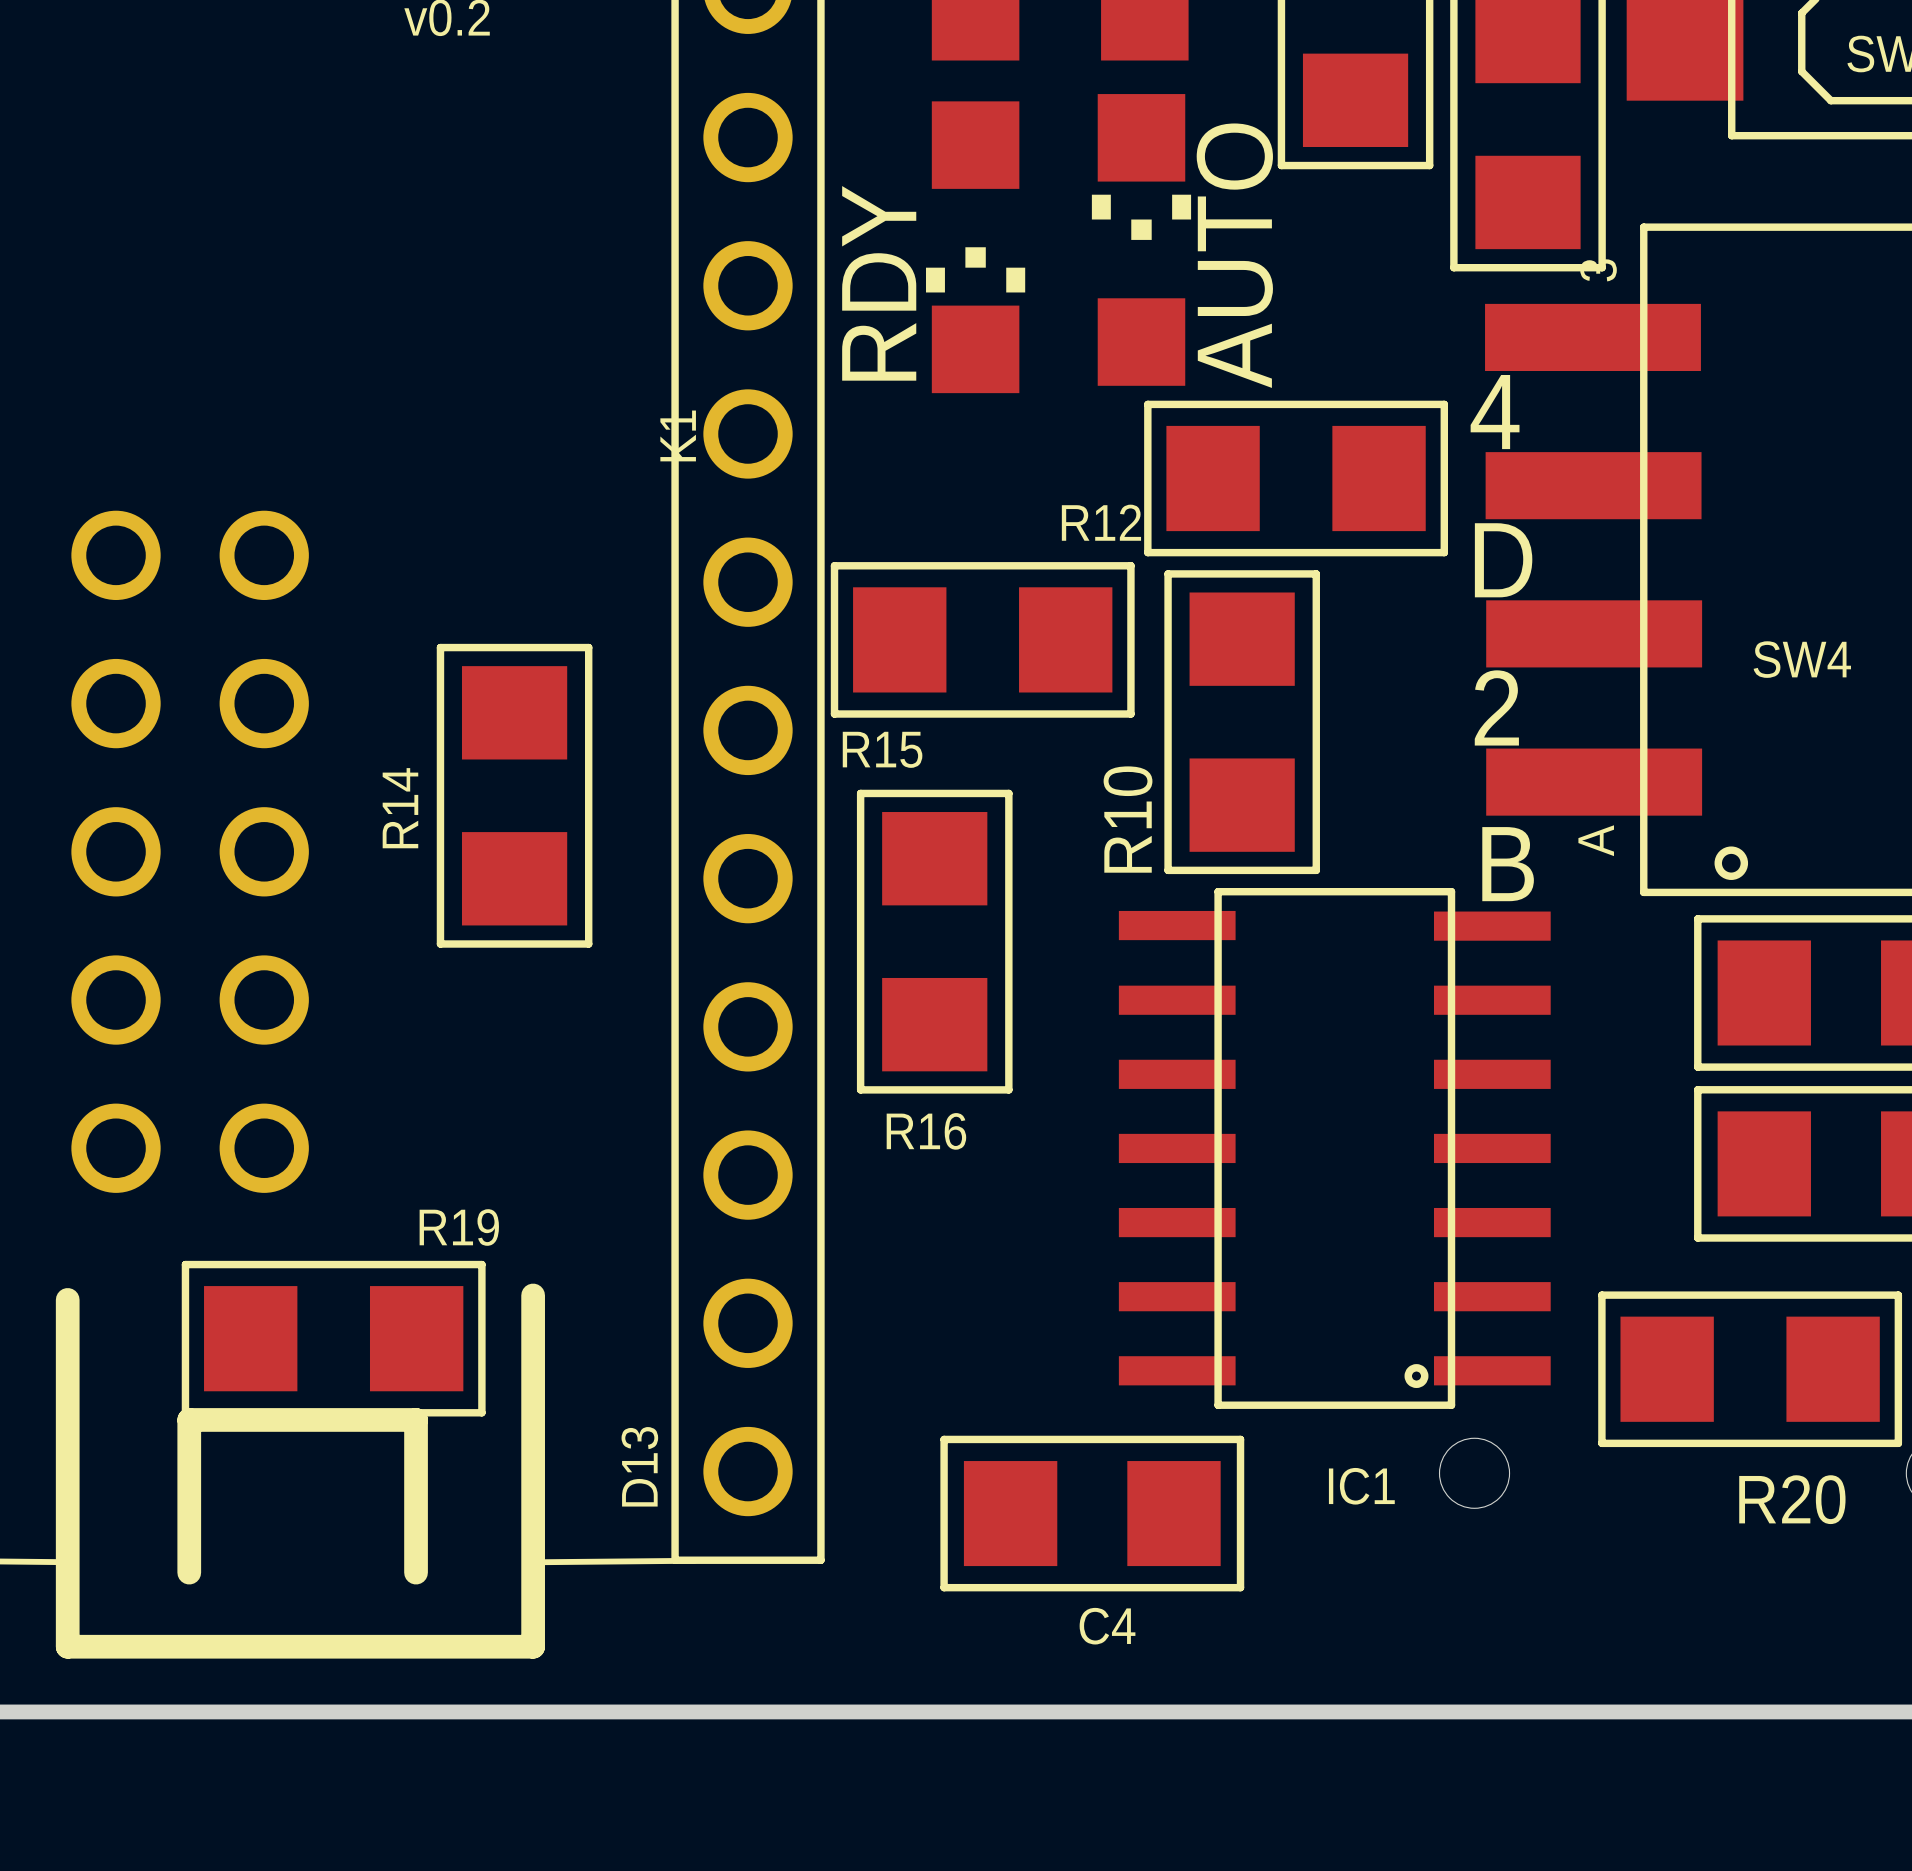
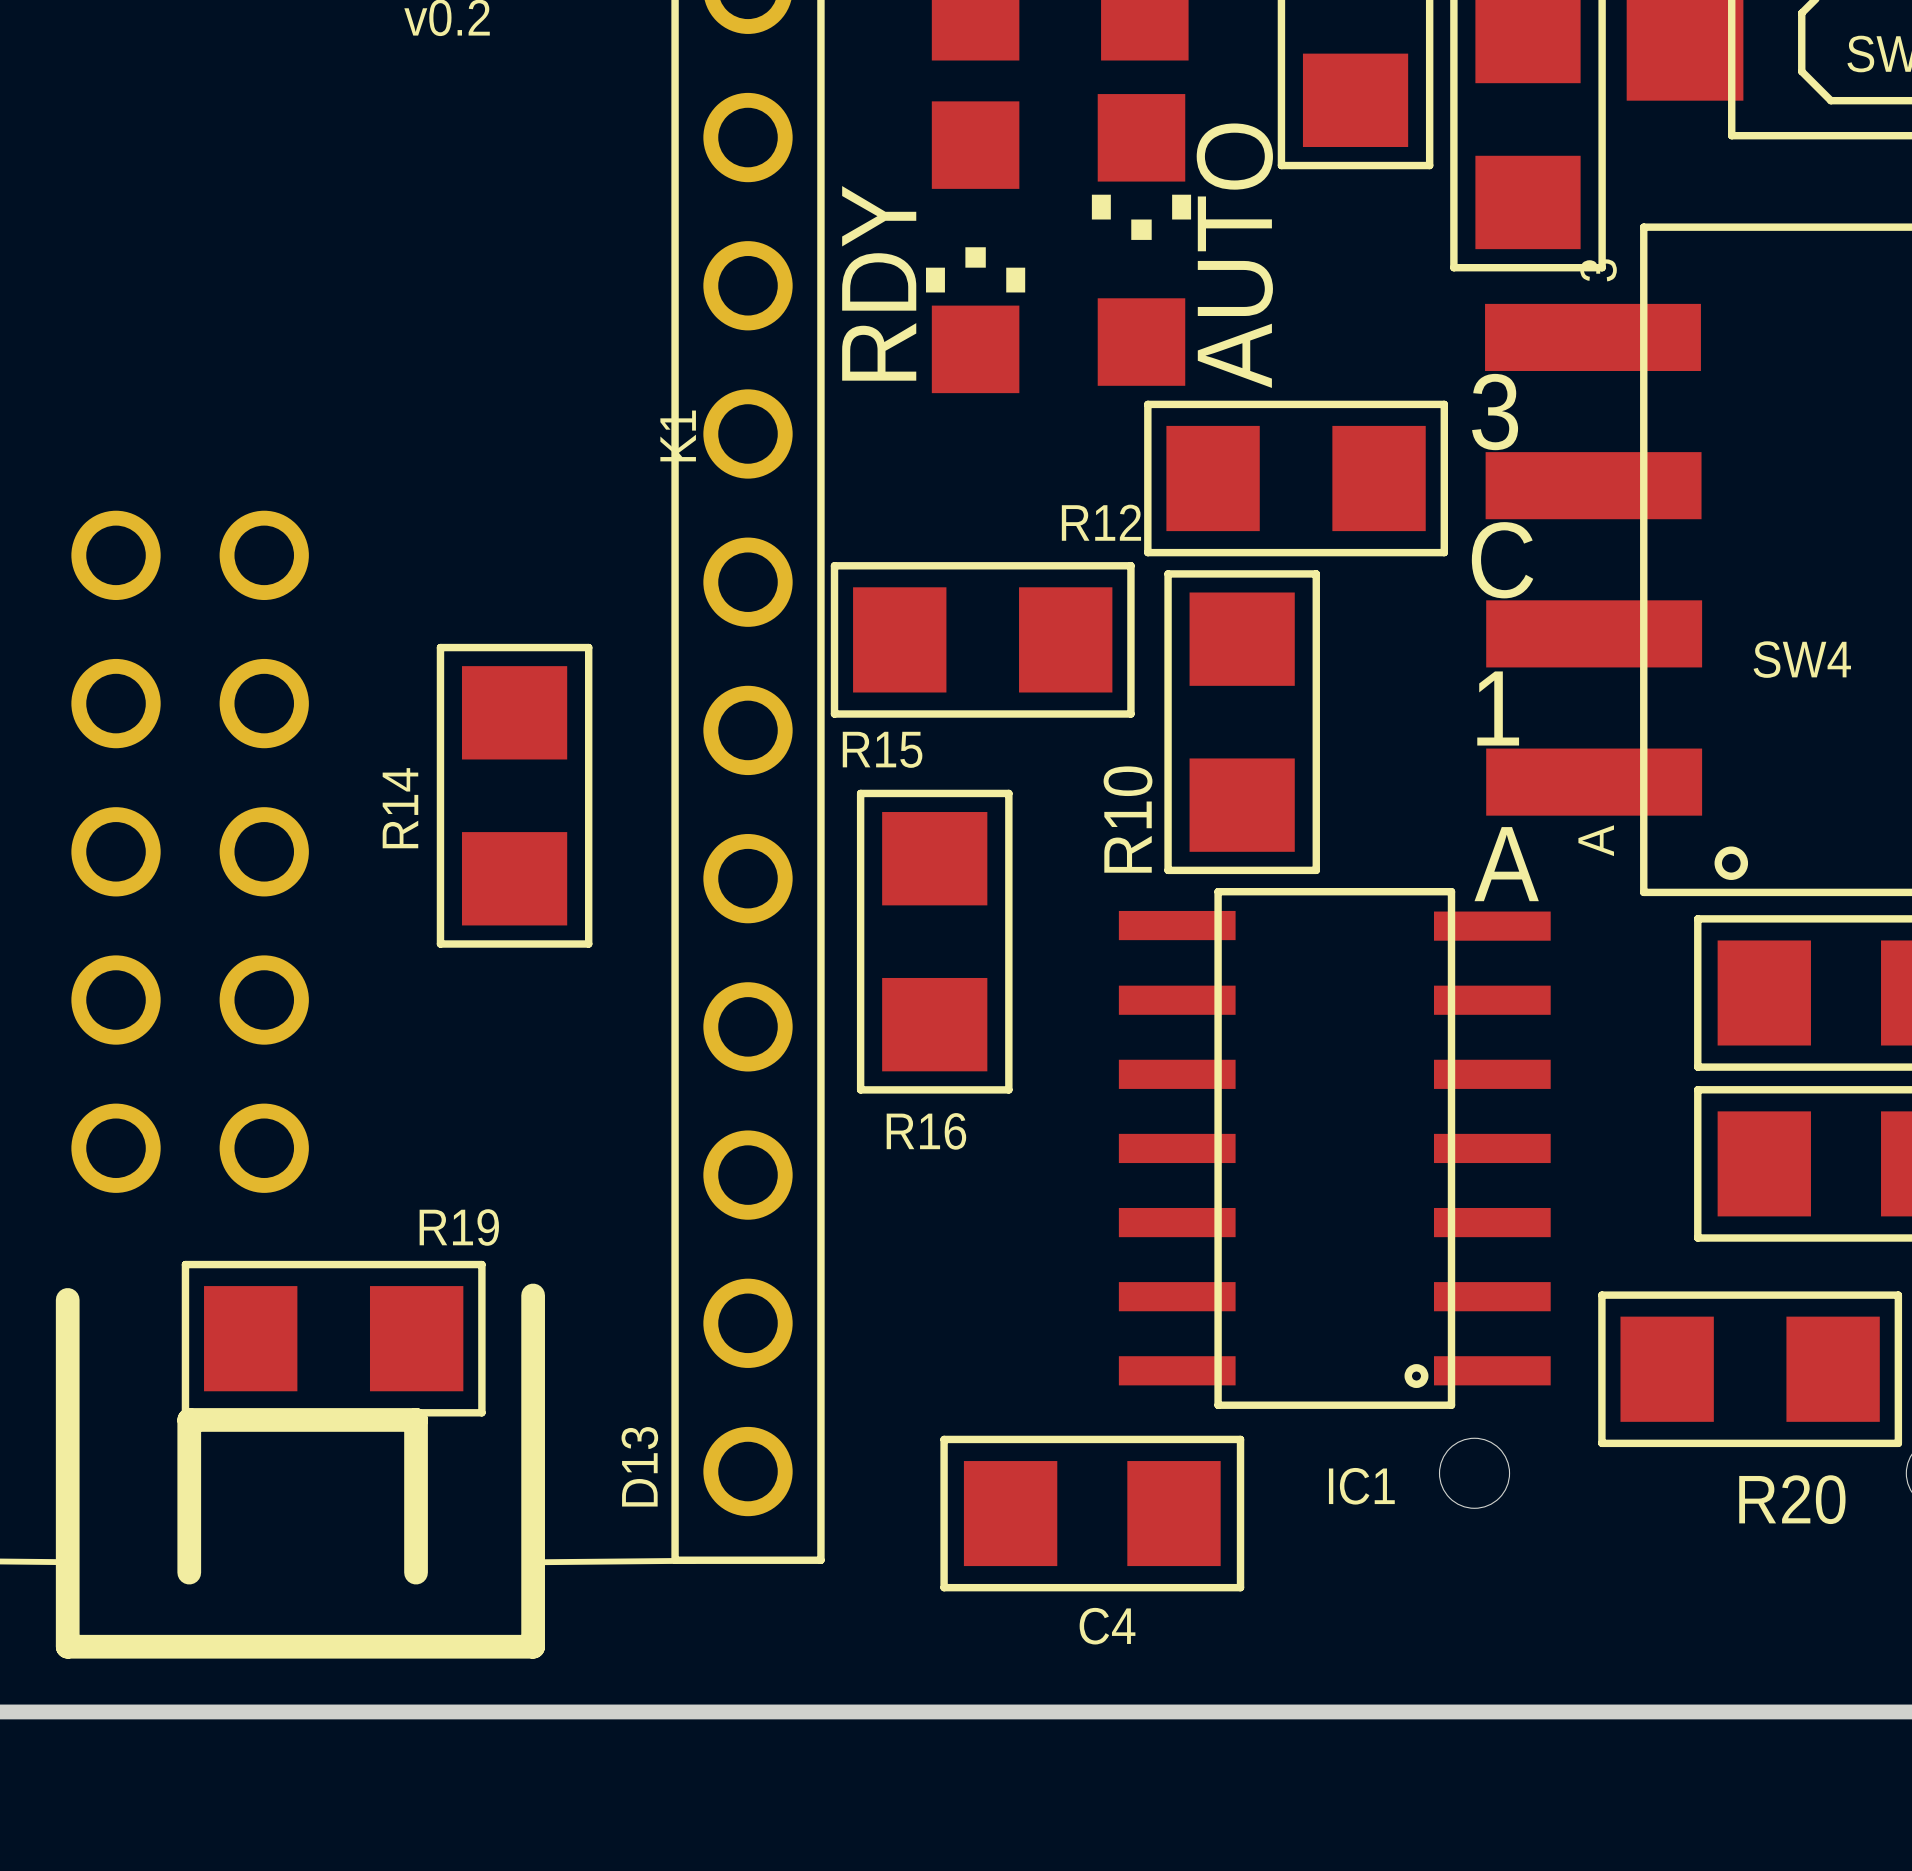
text: 4 (1495, 412) -> 3 (1495, 412)
text: D (1503, 560) -> C (1502, 560)
text: 2 (1496, 707) -> 1 (1498, 708)
text: B (1508, 864) -> A (1506, 864)

